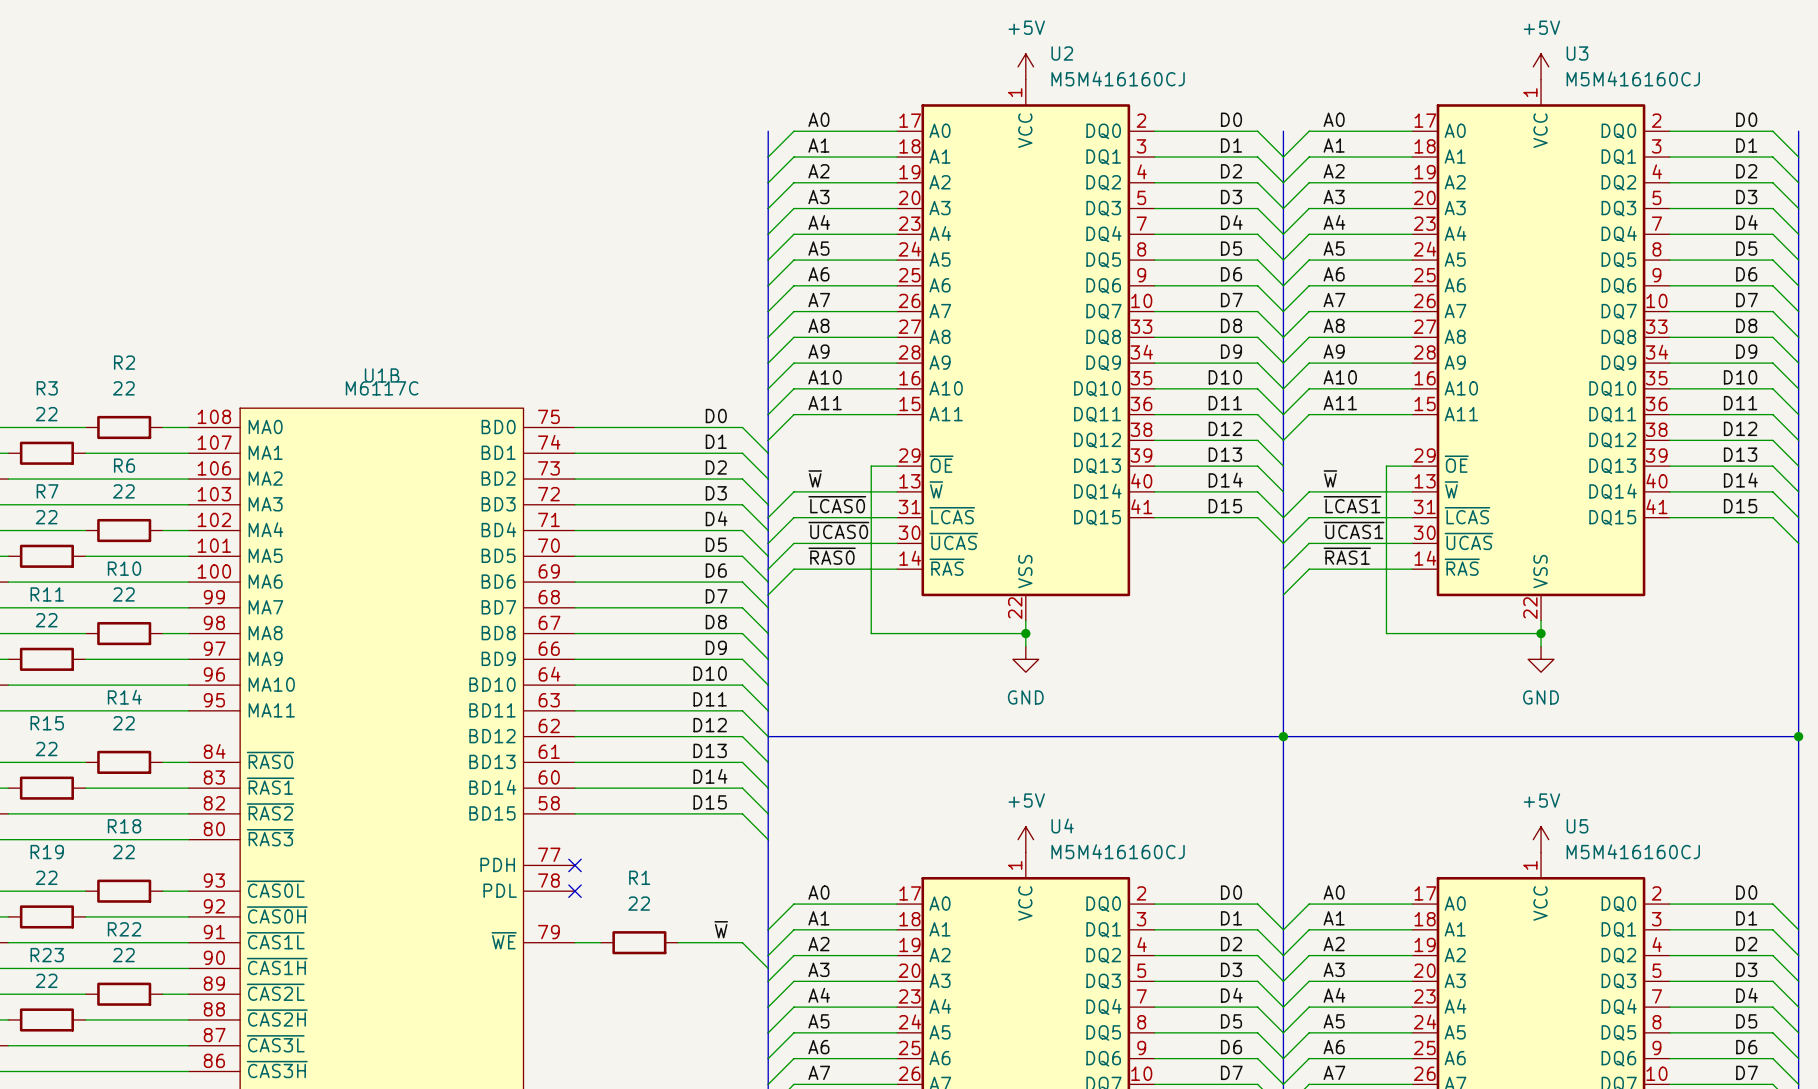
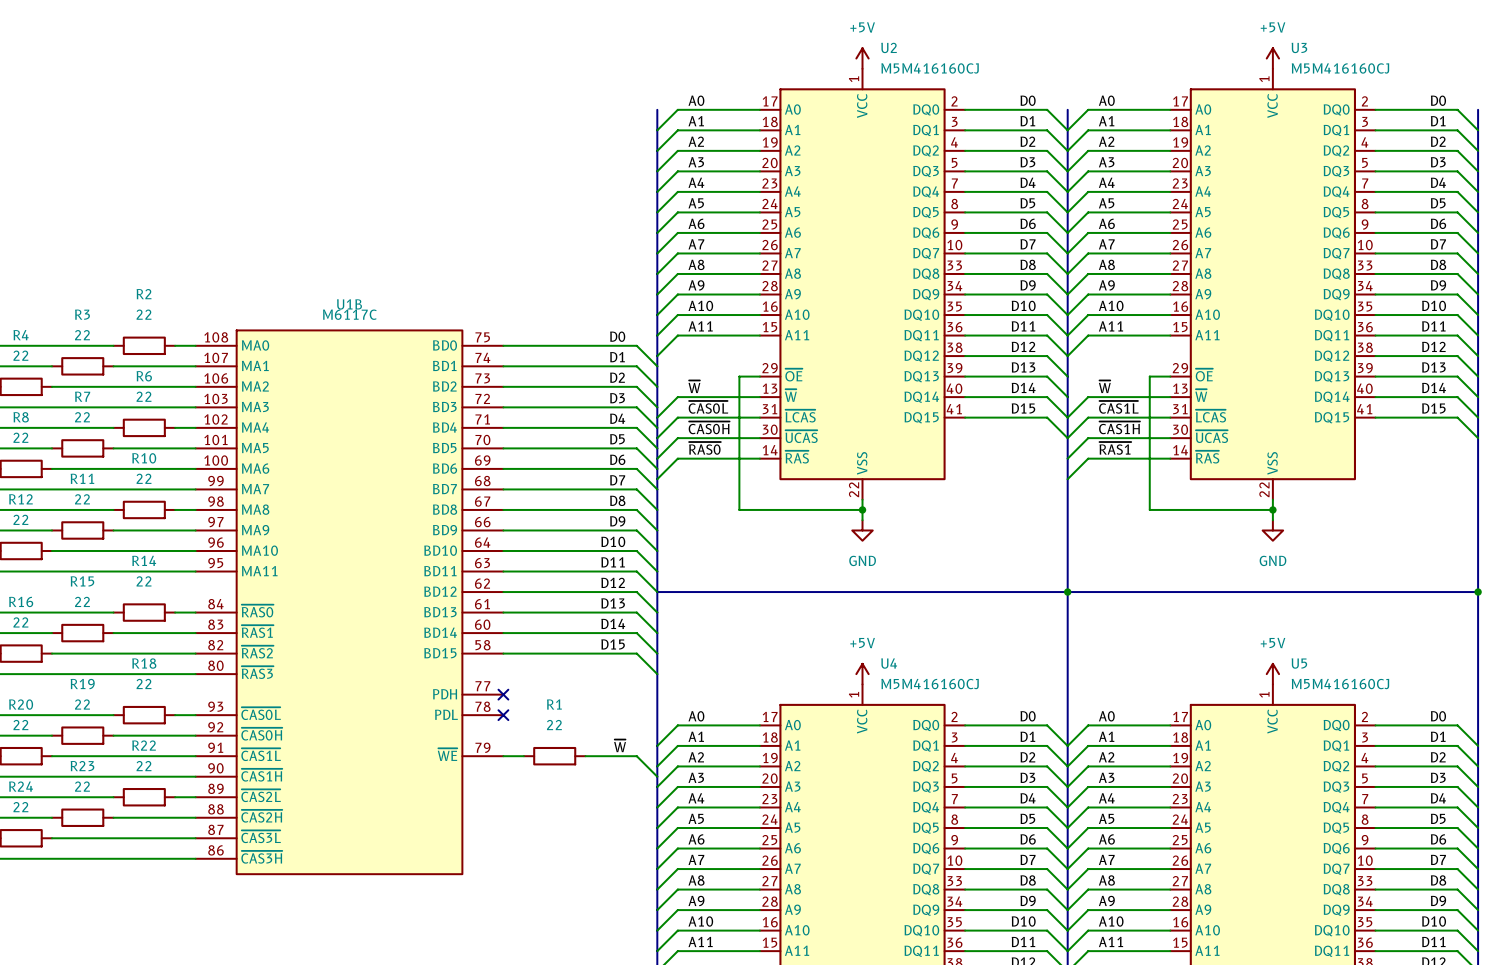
label: ~{LCAS0} (837, 504) -> ~{CAS0L} (708, 407)
label: ~{LCAS1} (1352, 504) -> ~{CAS1L} (1118, 407)
label: ~{UCAS0} (838, 530) -> ~{CAS0H} (709, 427)
label: ~{UCAS1} (1354, 530) -> ~{CAS1H} (1119, 427)

